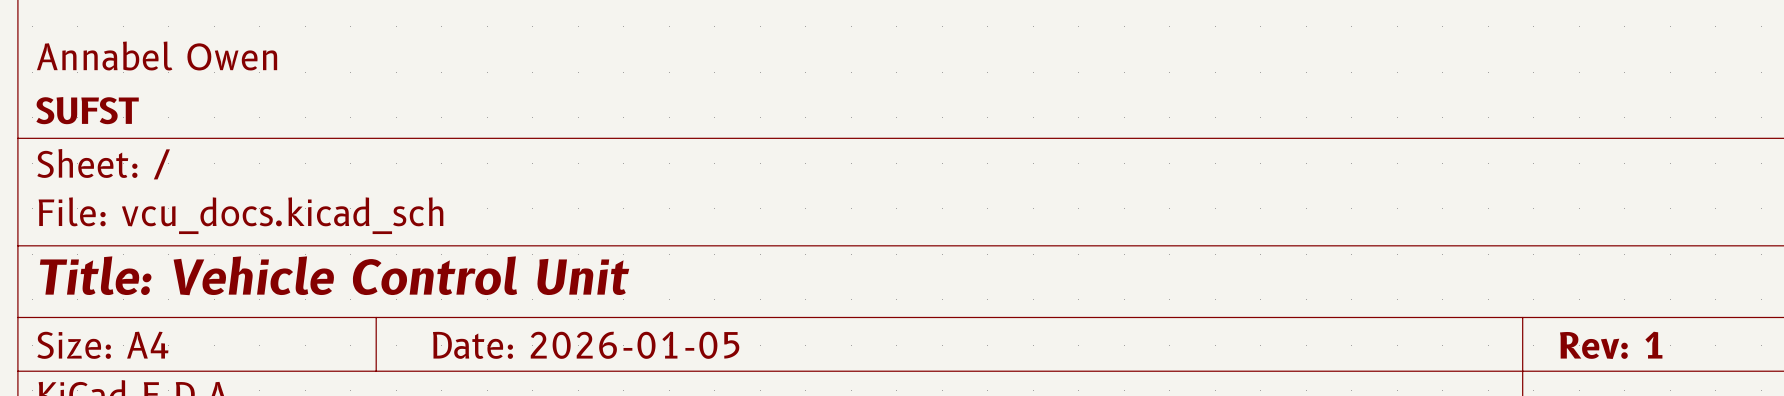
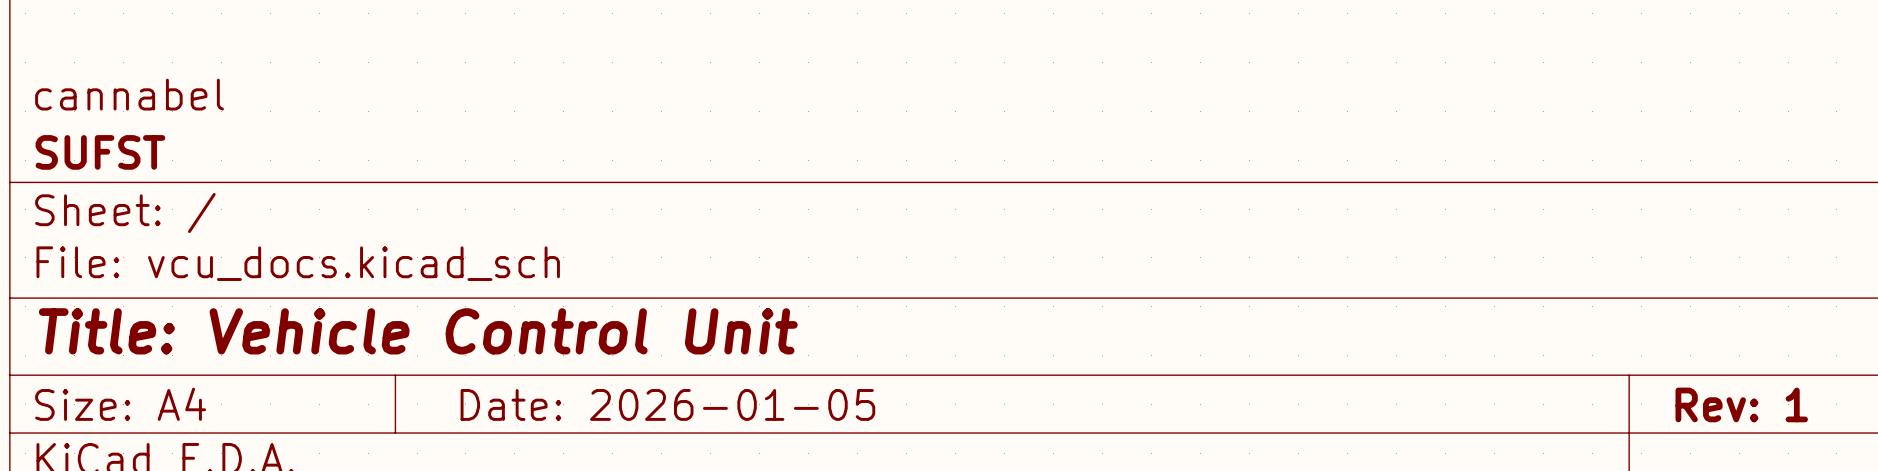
title block: Annabel Owen (157, 55) -> cannabel (129, 94)

